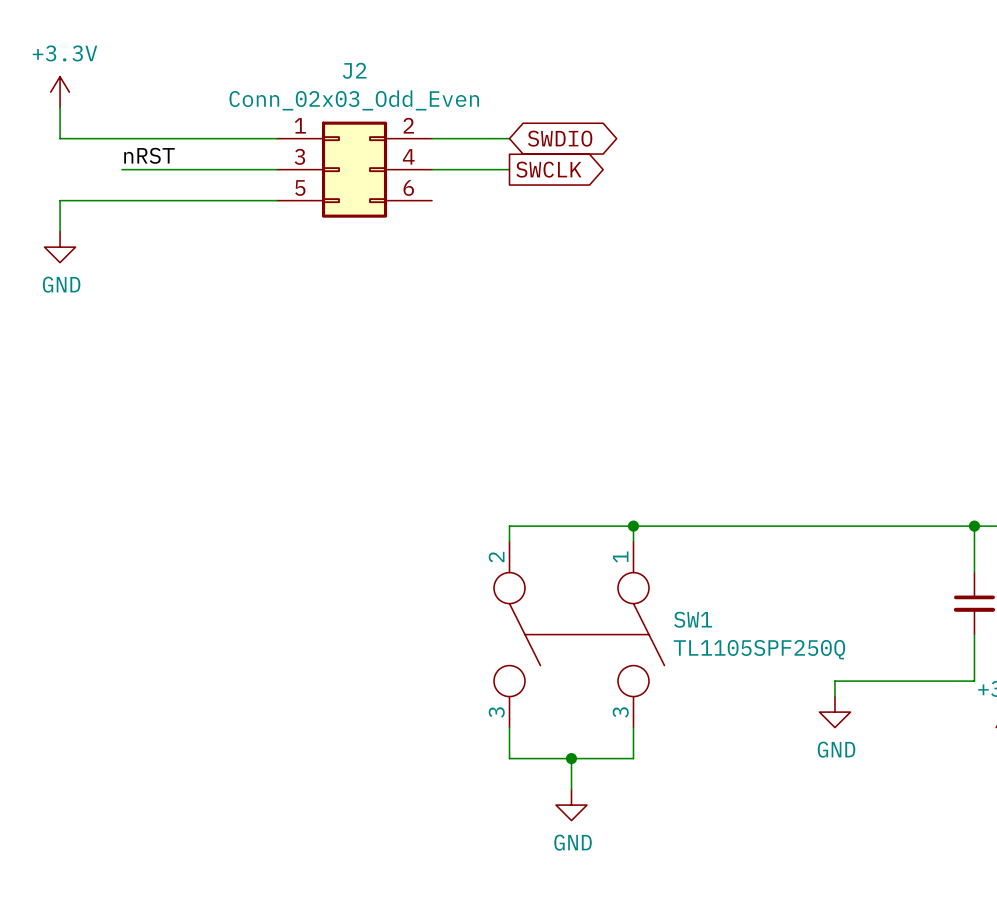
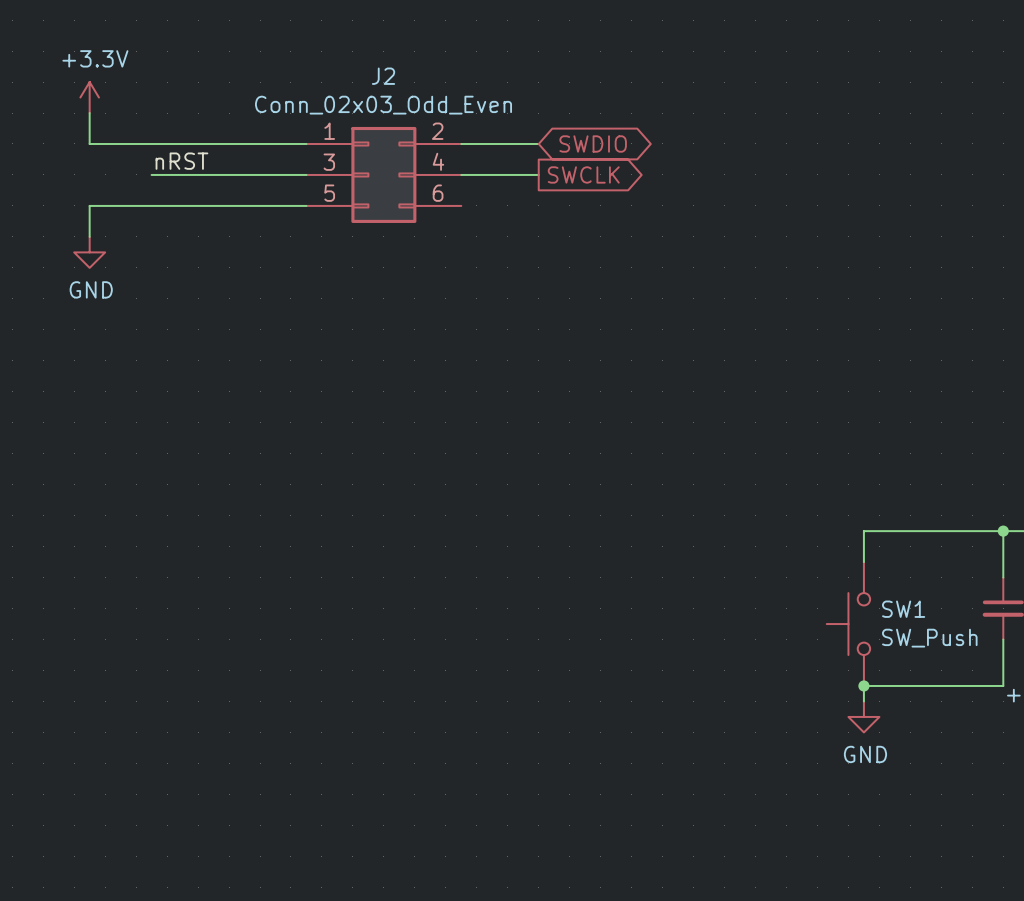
wire: (633, 526) (633, 541) -> none
junction: (633, 526) -> none
wire: (834, 526) (509, 526) (509, 541) -> (863, 531) (863, 562)
SW1 symbol: [494, 541, 665, 728] -> [826, 562, 871, 686]
SW1 name position: SW1 (693, 619) -> SW1 (903, 609)
SW1 value: TL1105SPF250Q (759, 649) -> SW_Push (929, 638)
junction: none -> (863, 685)
wire: (509, 727) (509, 758) (633, 758) (633, 727) -> none
wire: (571, 758) (571, 789) -> none
junction: (571, 758) -> none
power symbol: GND (571, 805) -> none

